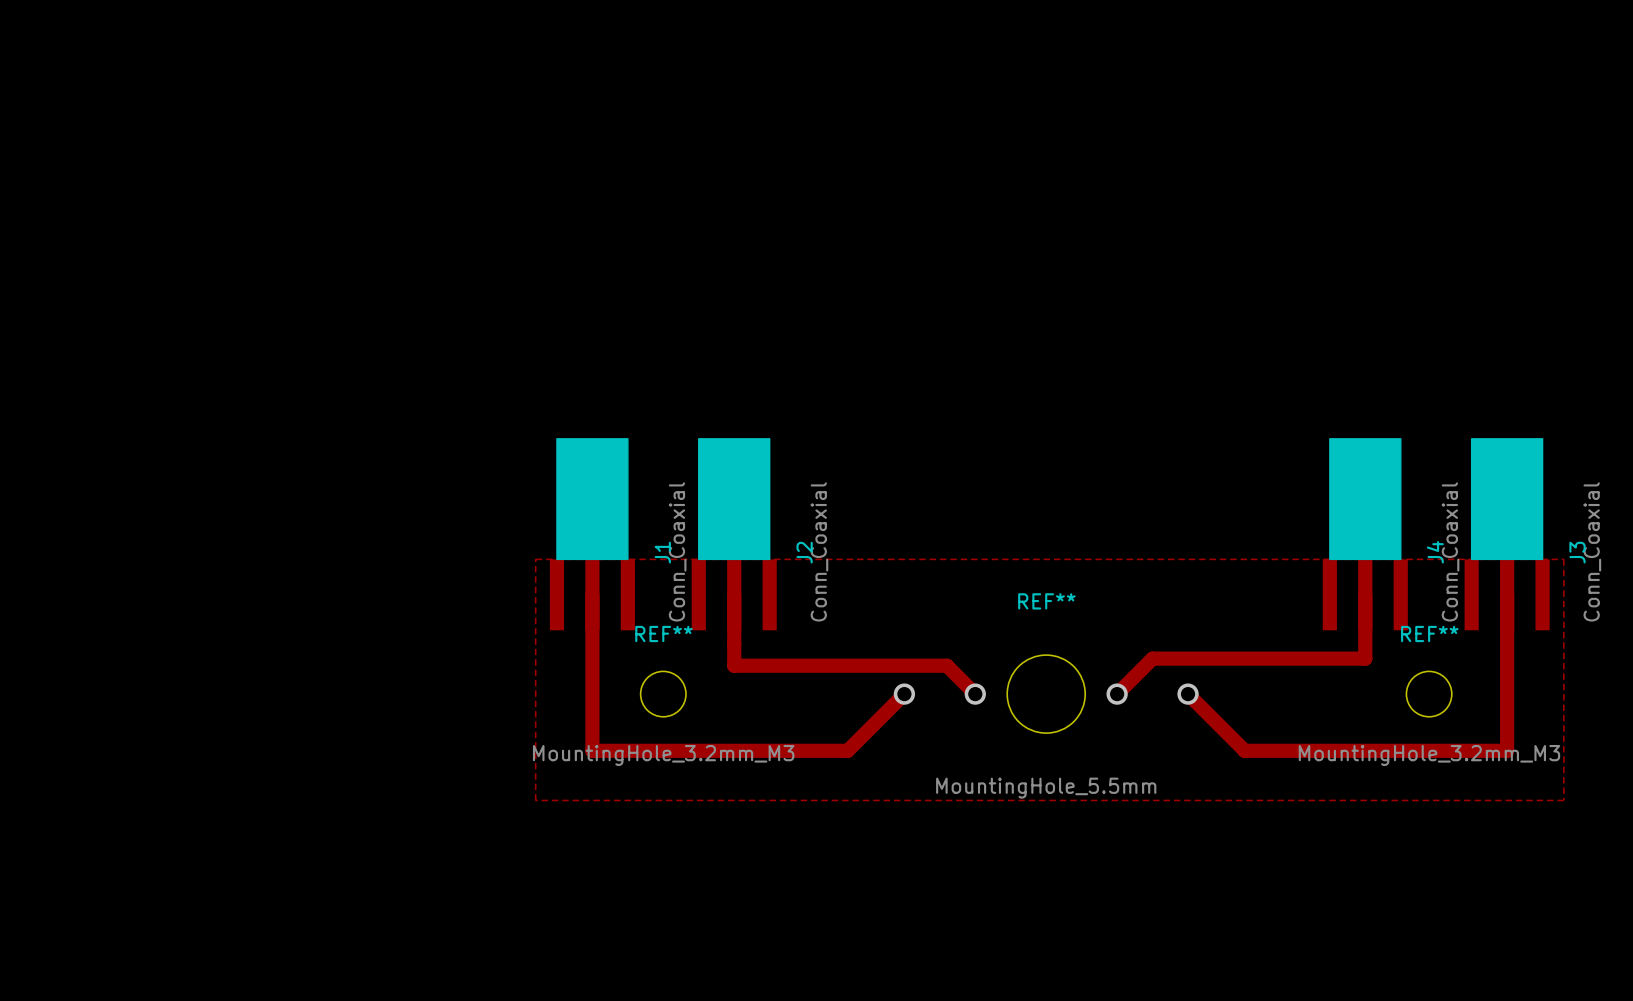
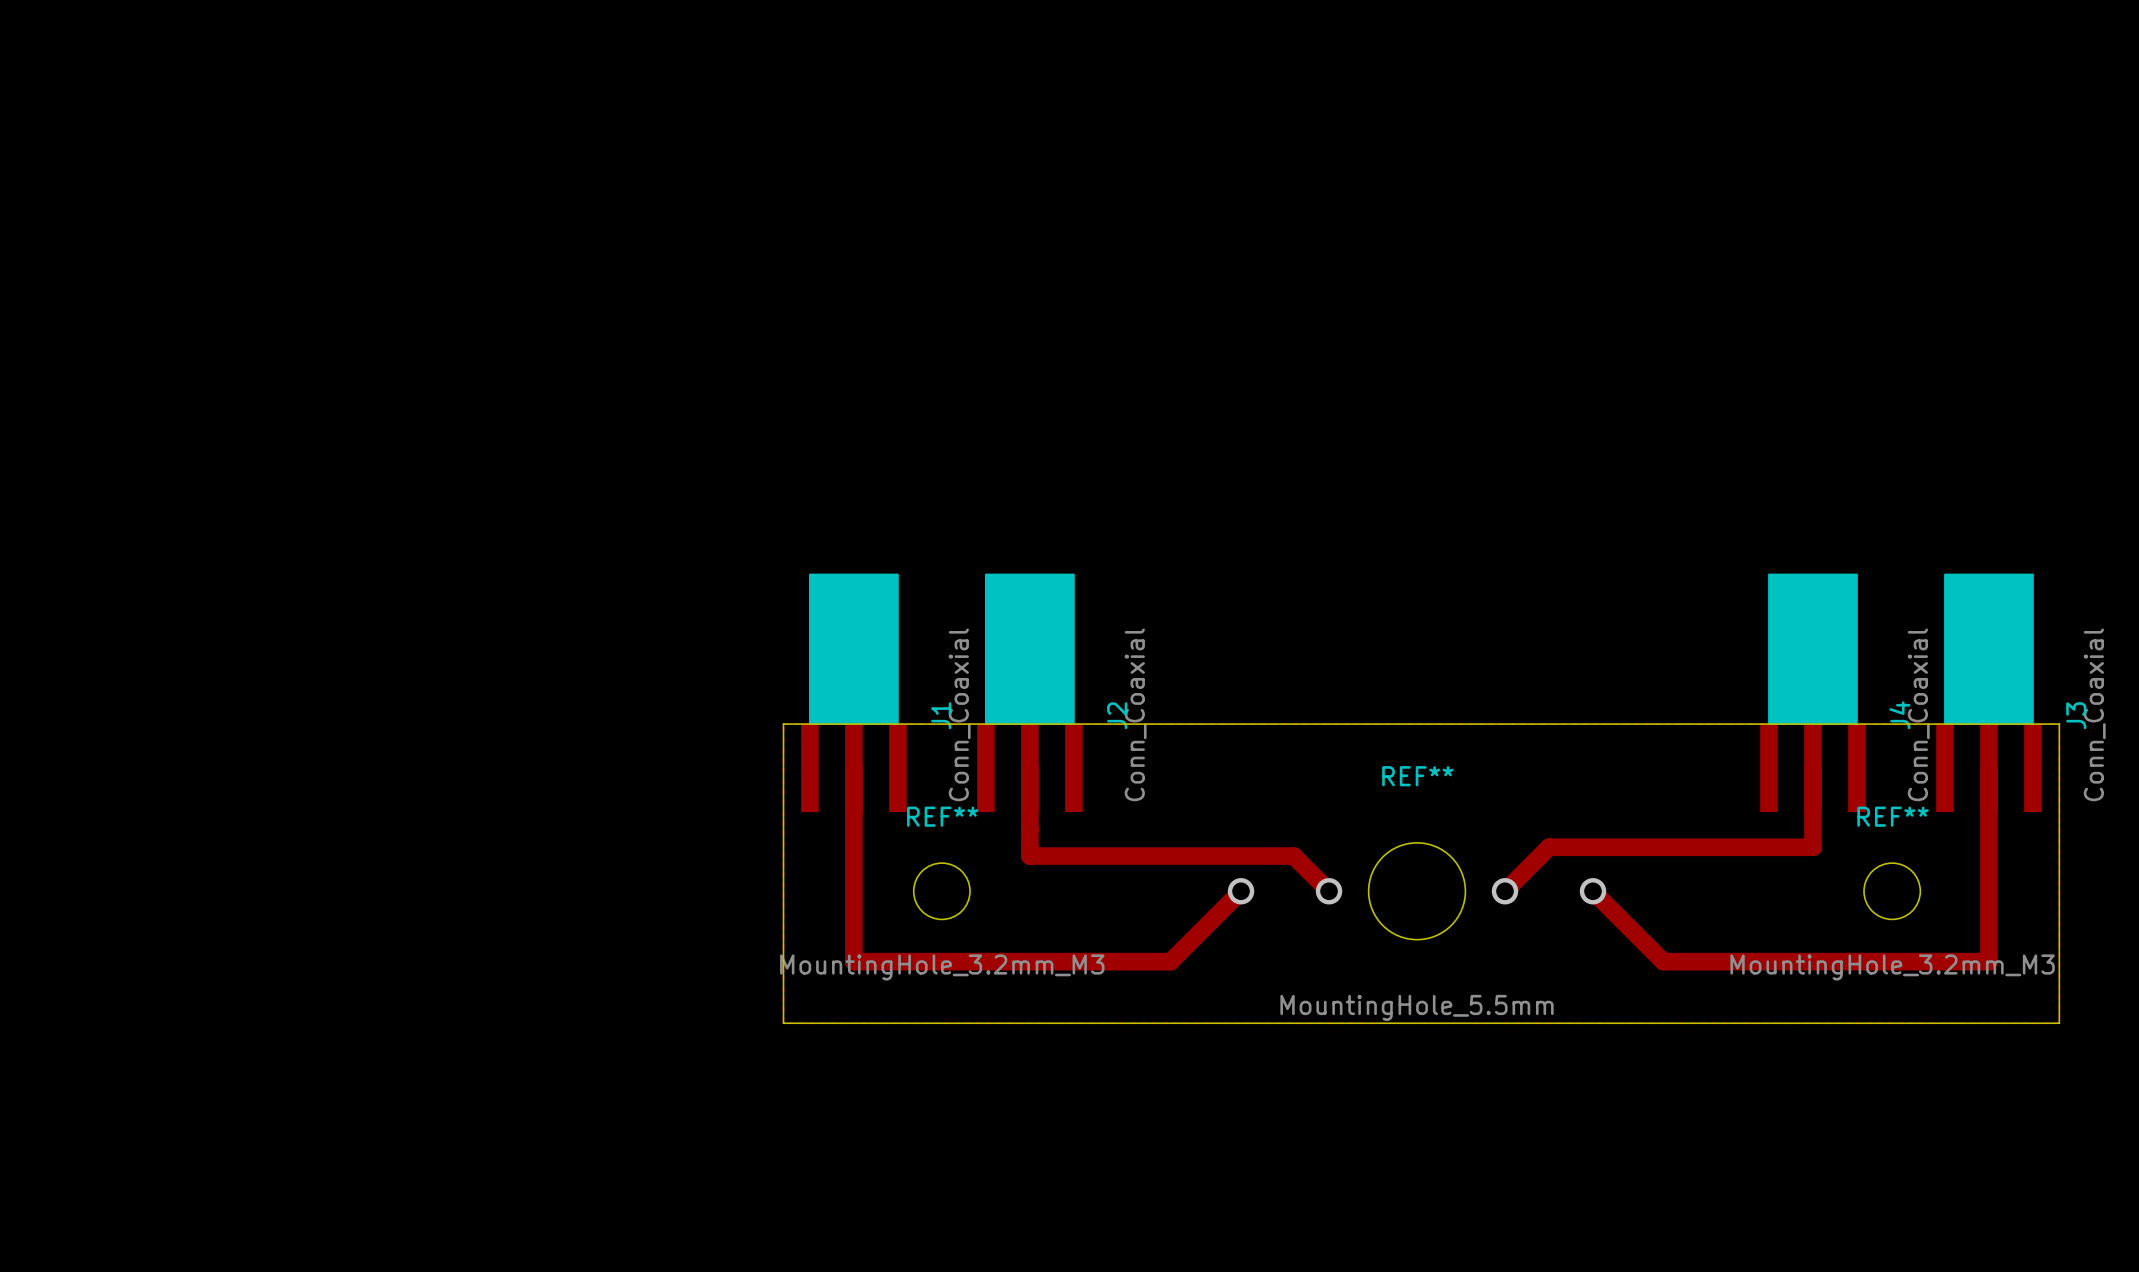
board edge: none -> (783, 724) (783, 1023) (2059, 1023) (2059, 724) (783, 724)

